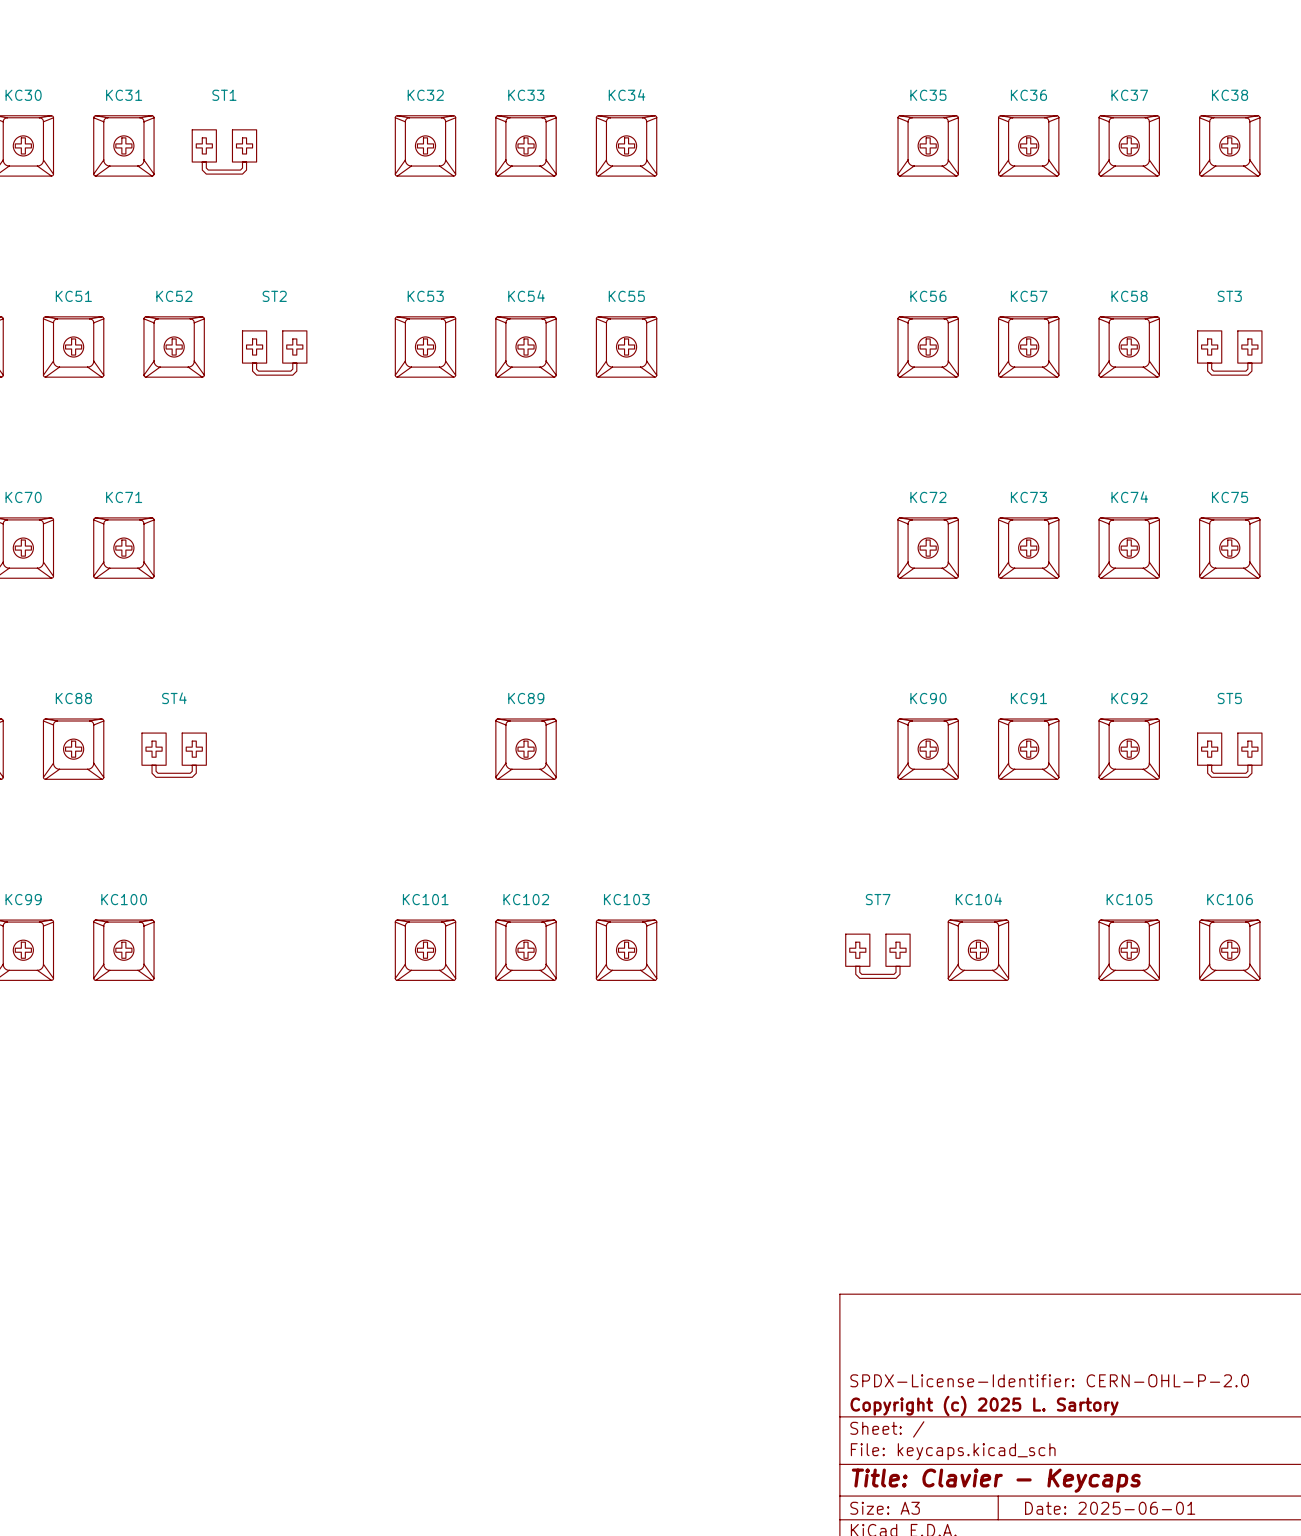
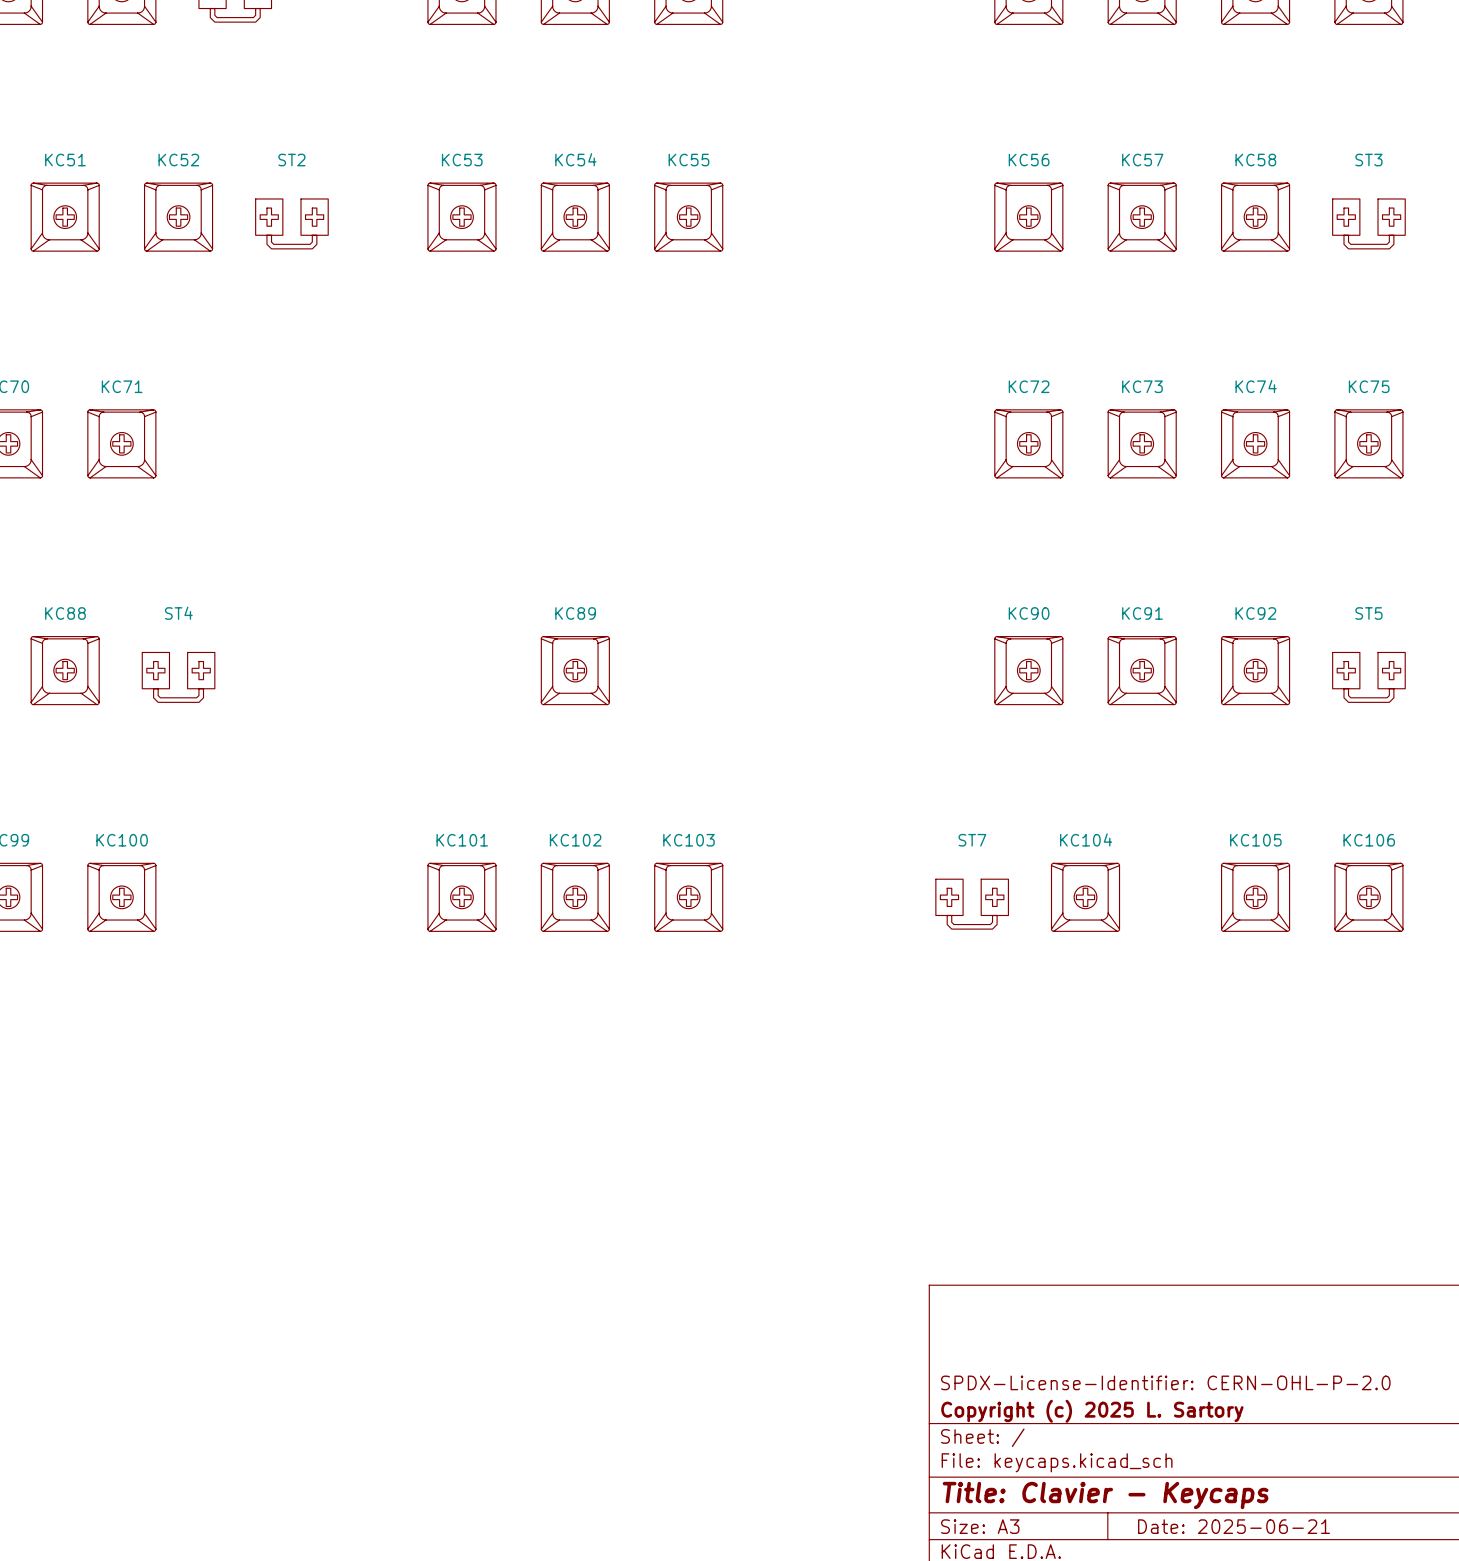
title block: Date: 2025-06-01 (1110, 1508) -> Date: 2025-06-21 (1234, 1526)

